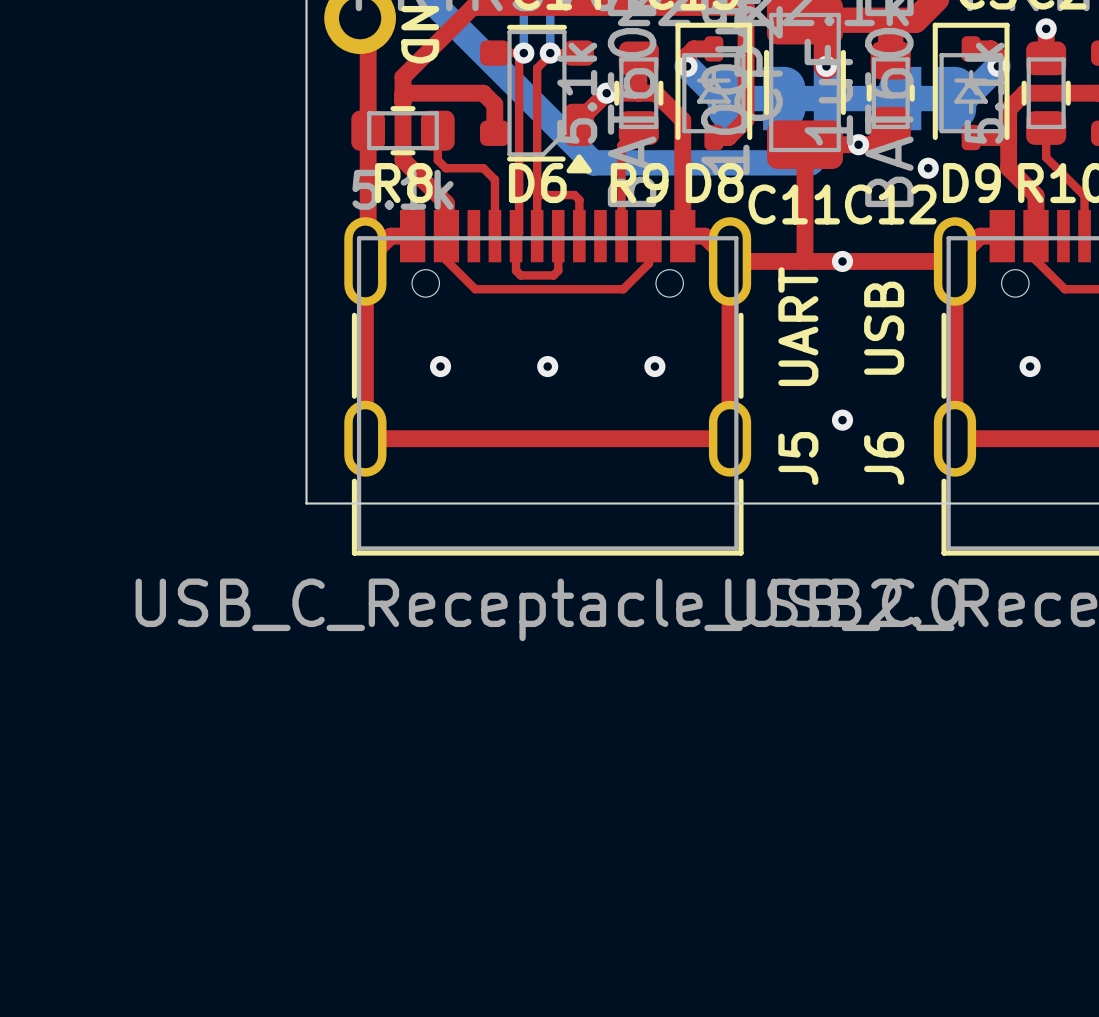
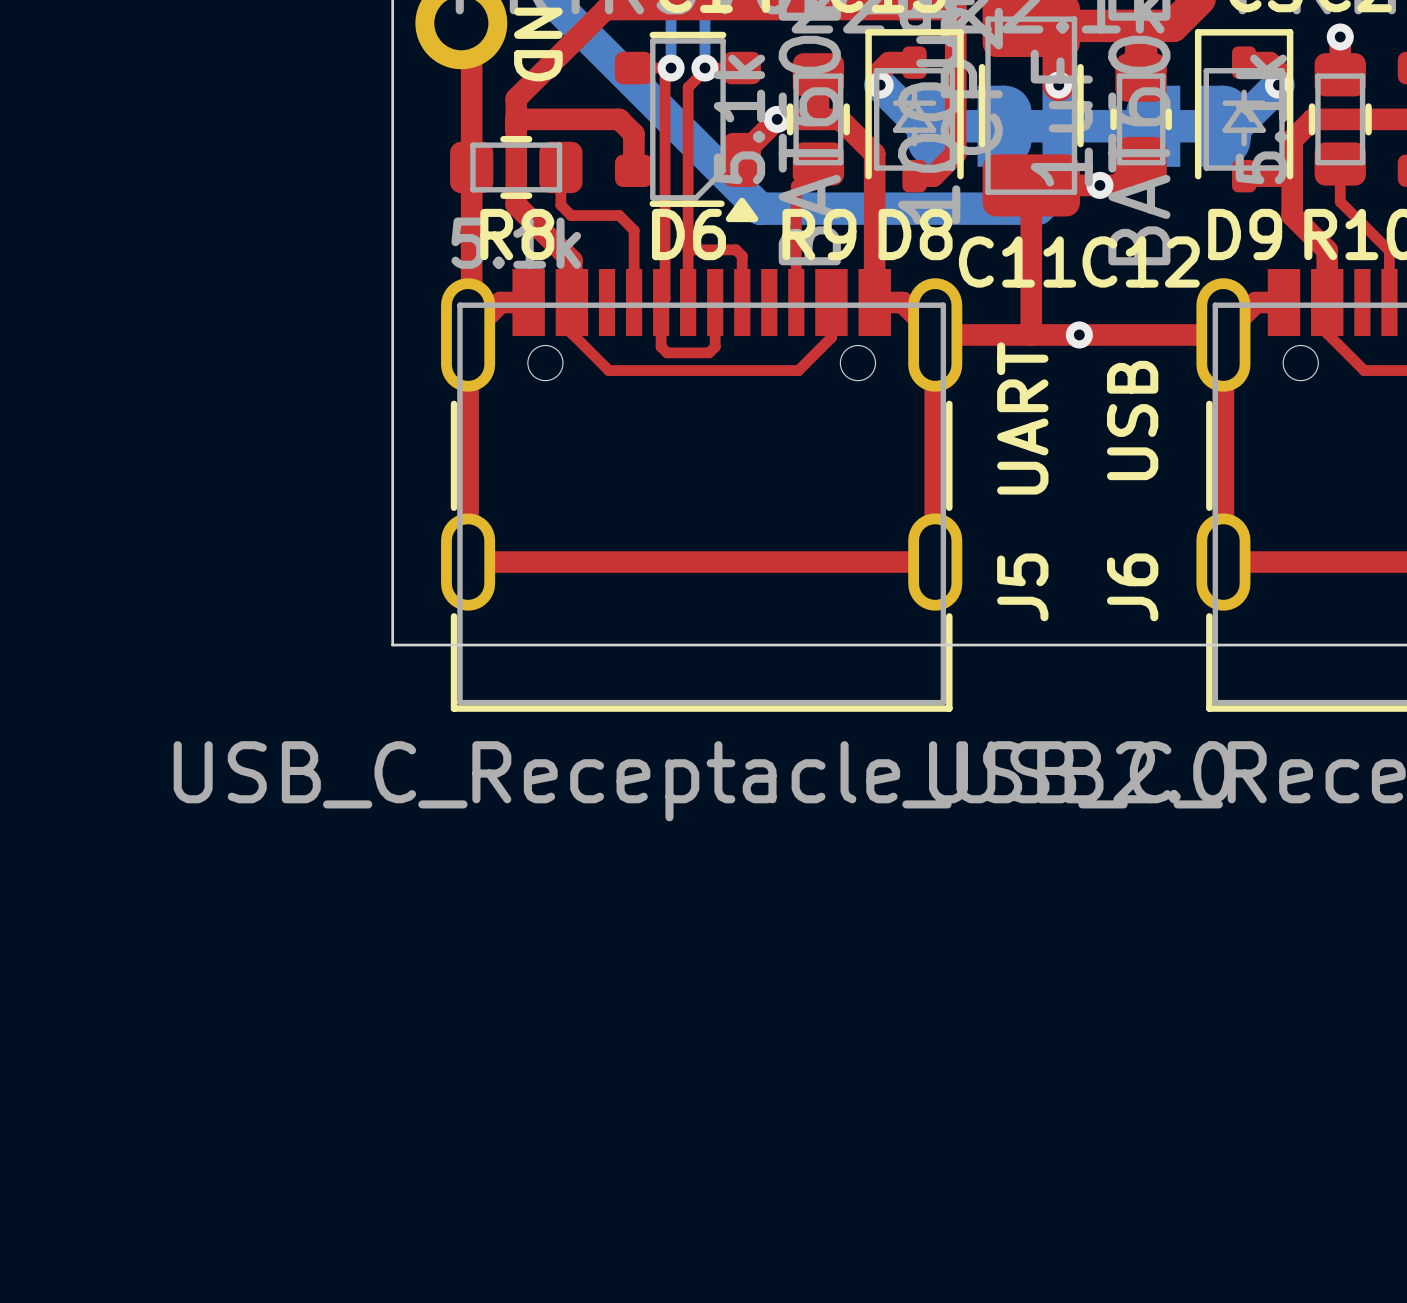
via: (928, 168) -> none
via: (440, 366) -> none
via: (547, 366) -> none
via: (654, 366) -> none
via: (1030, 366) -> none
via: (842, 420) -> none

